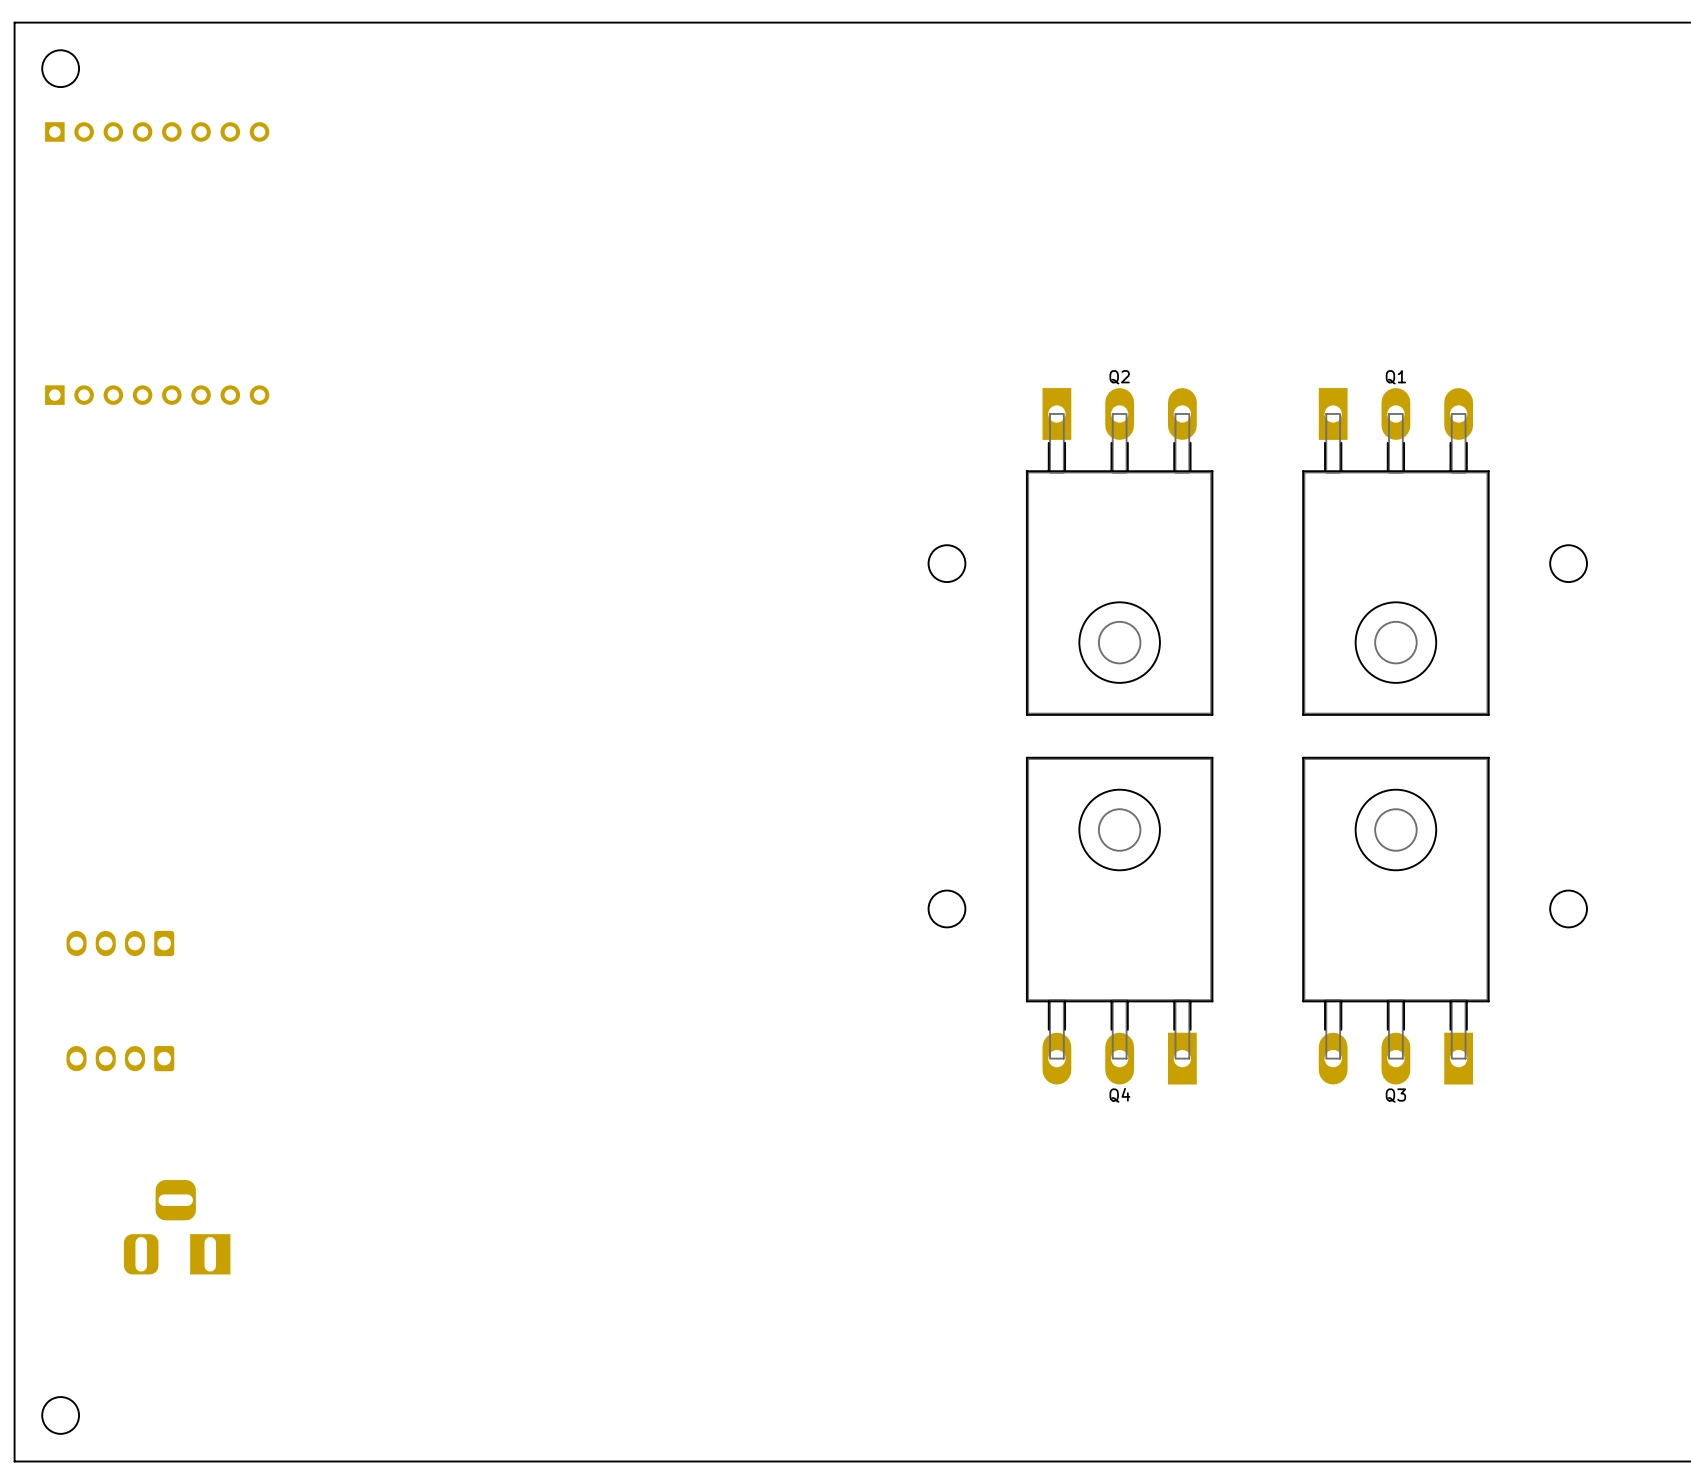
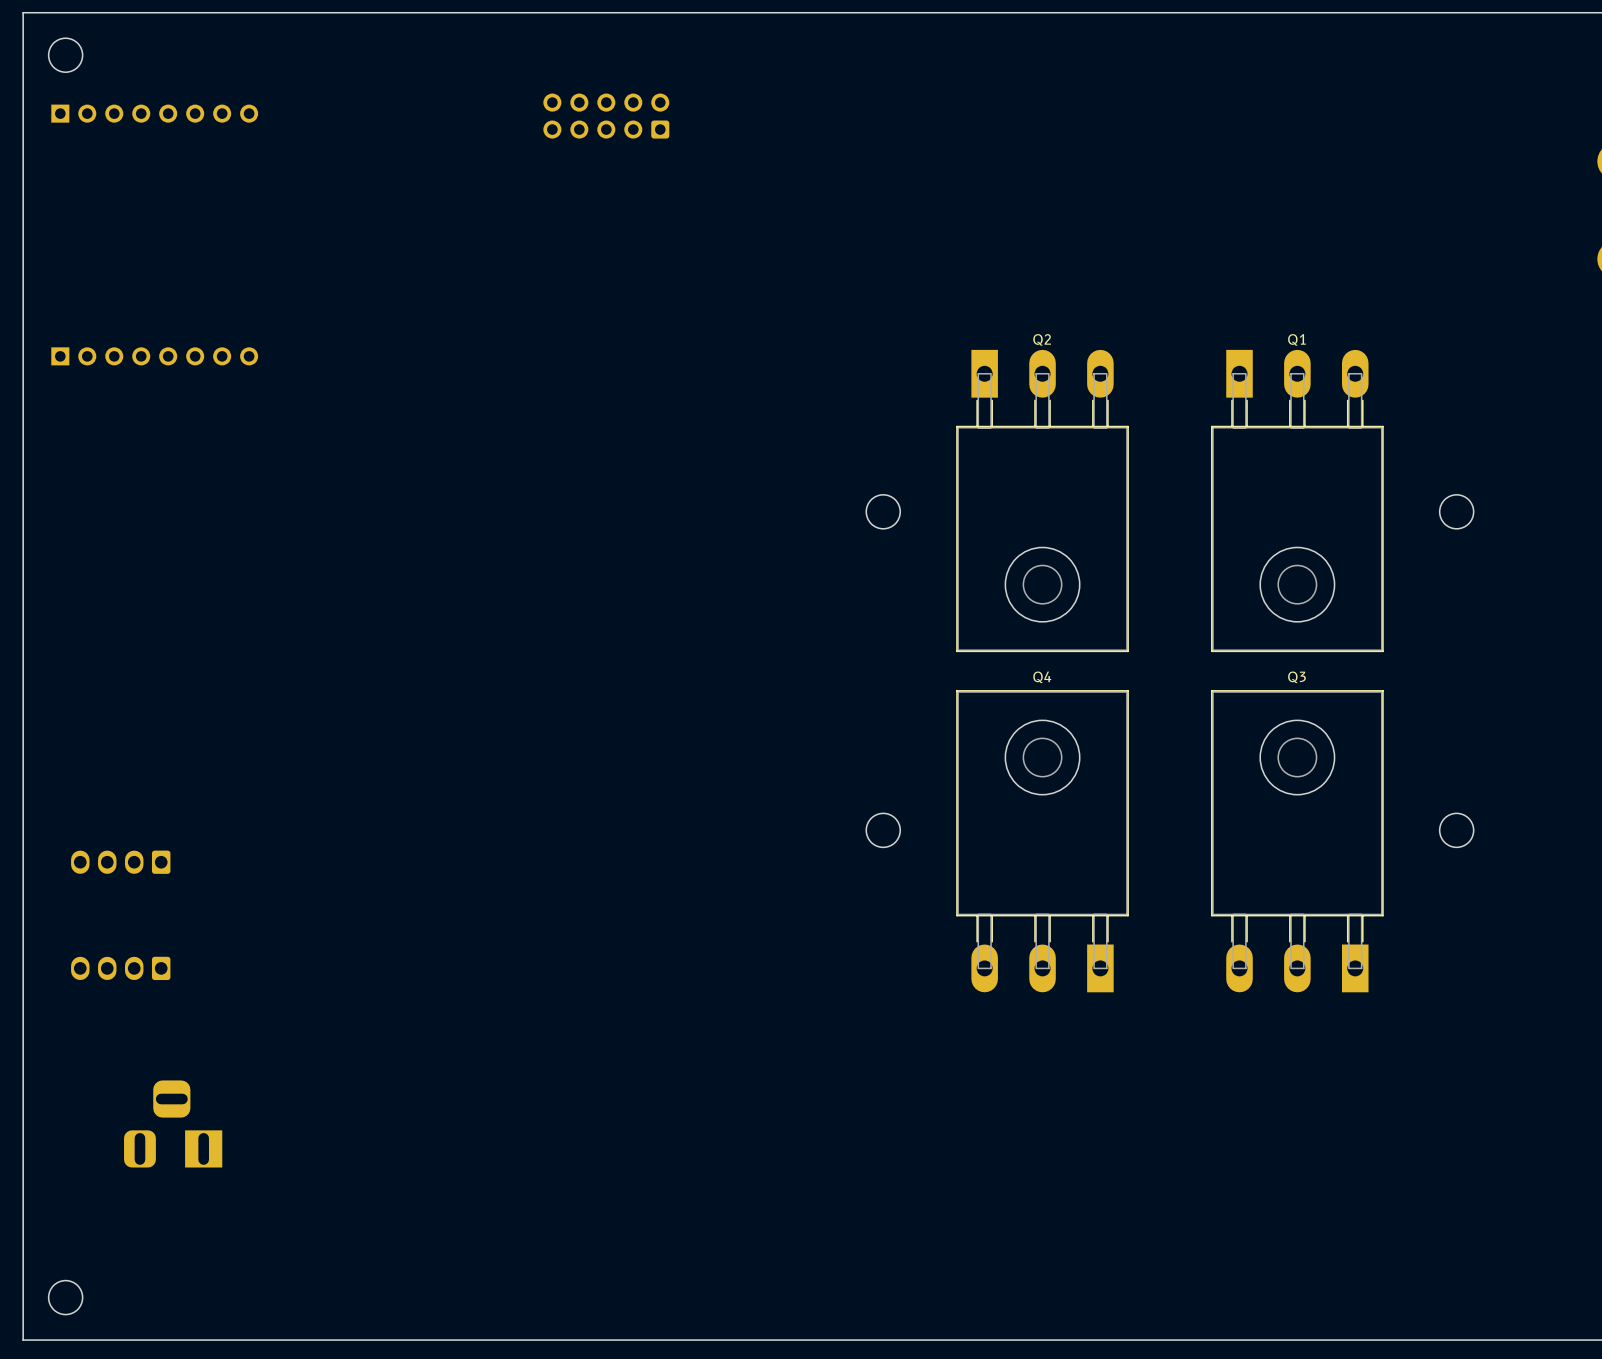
part: none -> (606, 116)
Q4 name position: Q4 (1119, 1095) -> Q4 (1042, 677)
Q3 name position: Q3 (1395, 1095) -> Q3 (1296, 677)

